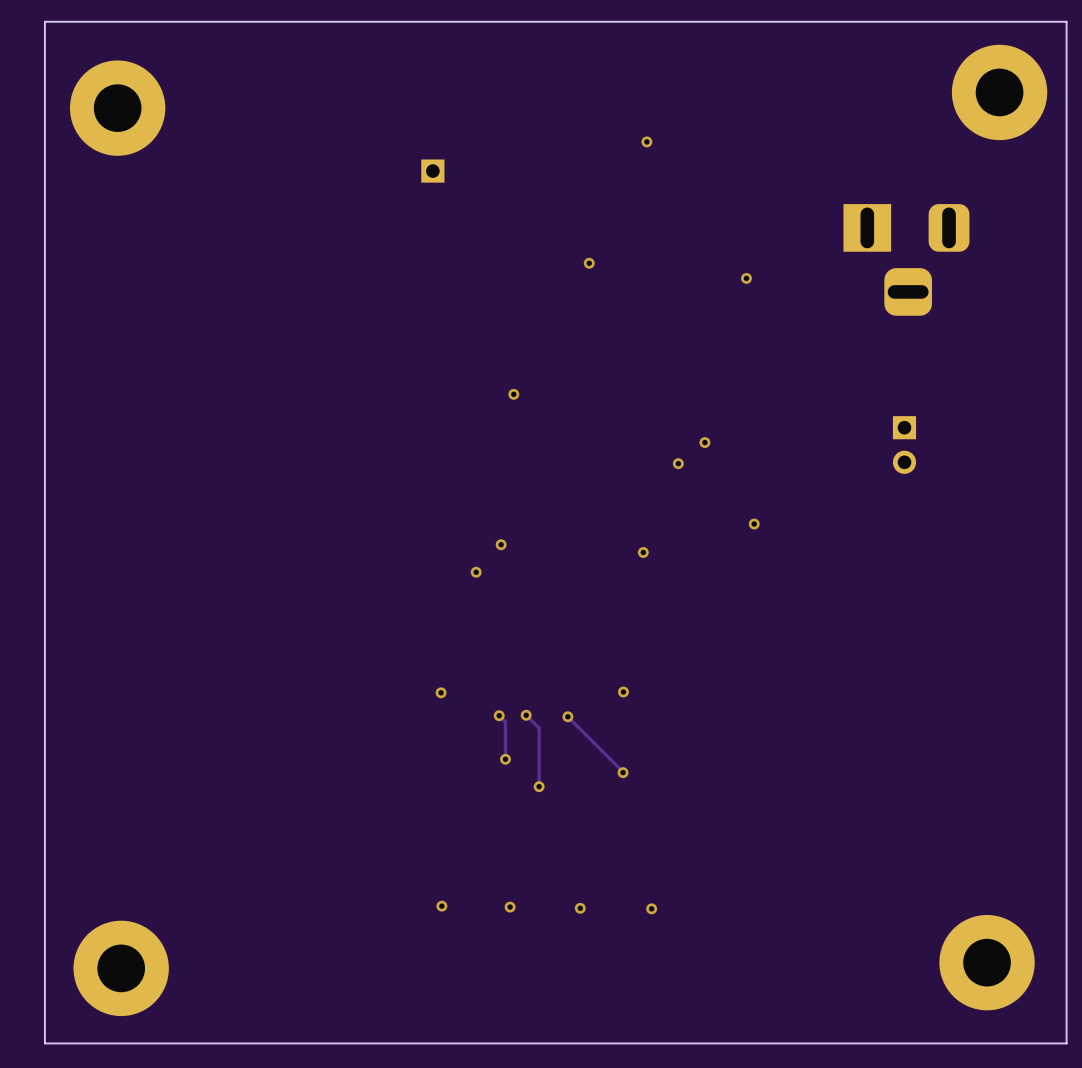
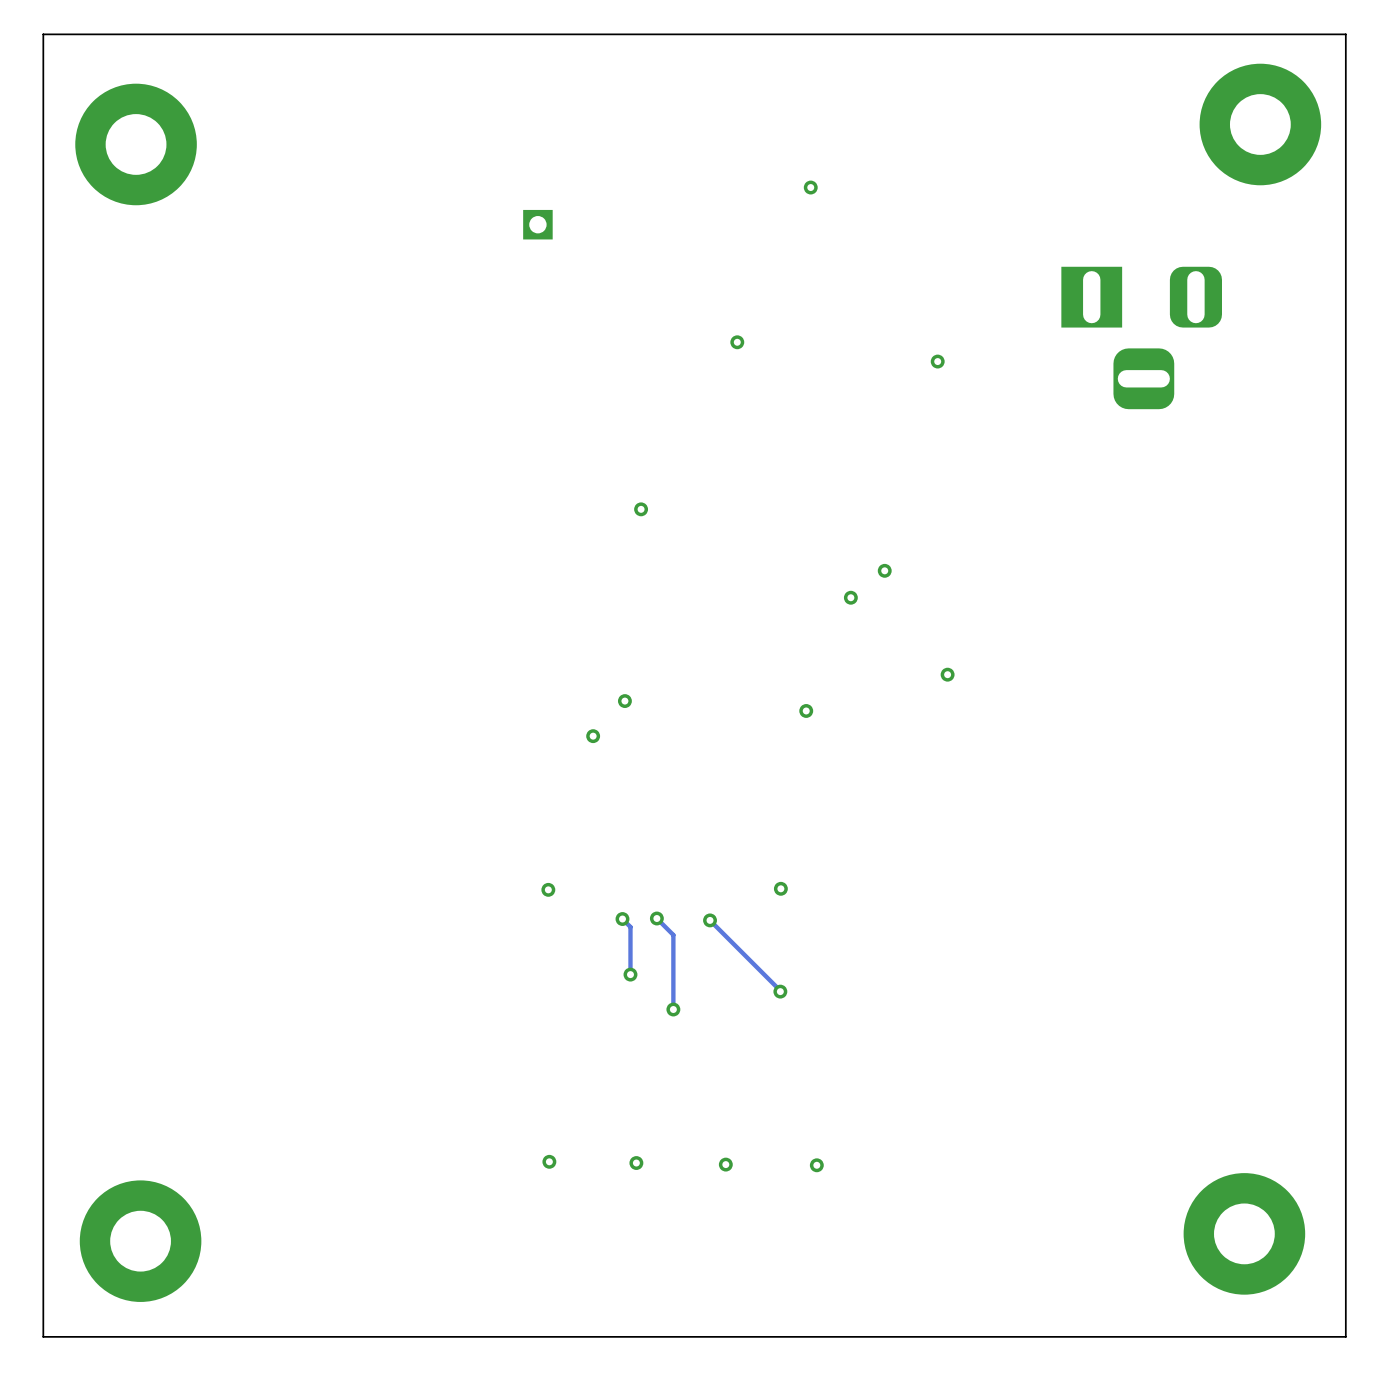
part: (904, 445) -> none

